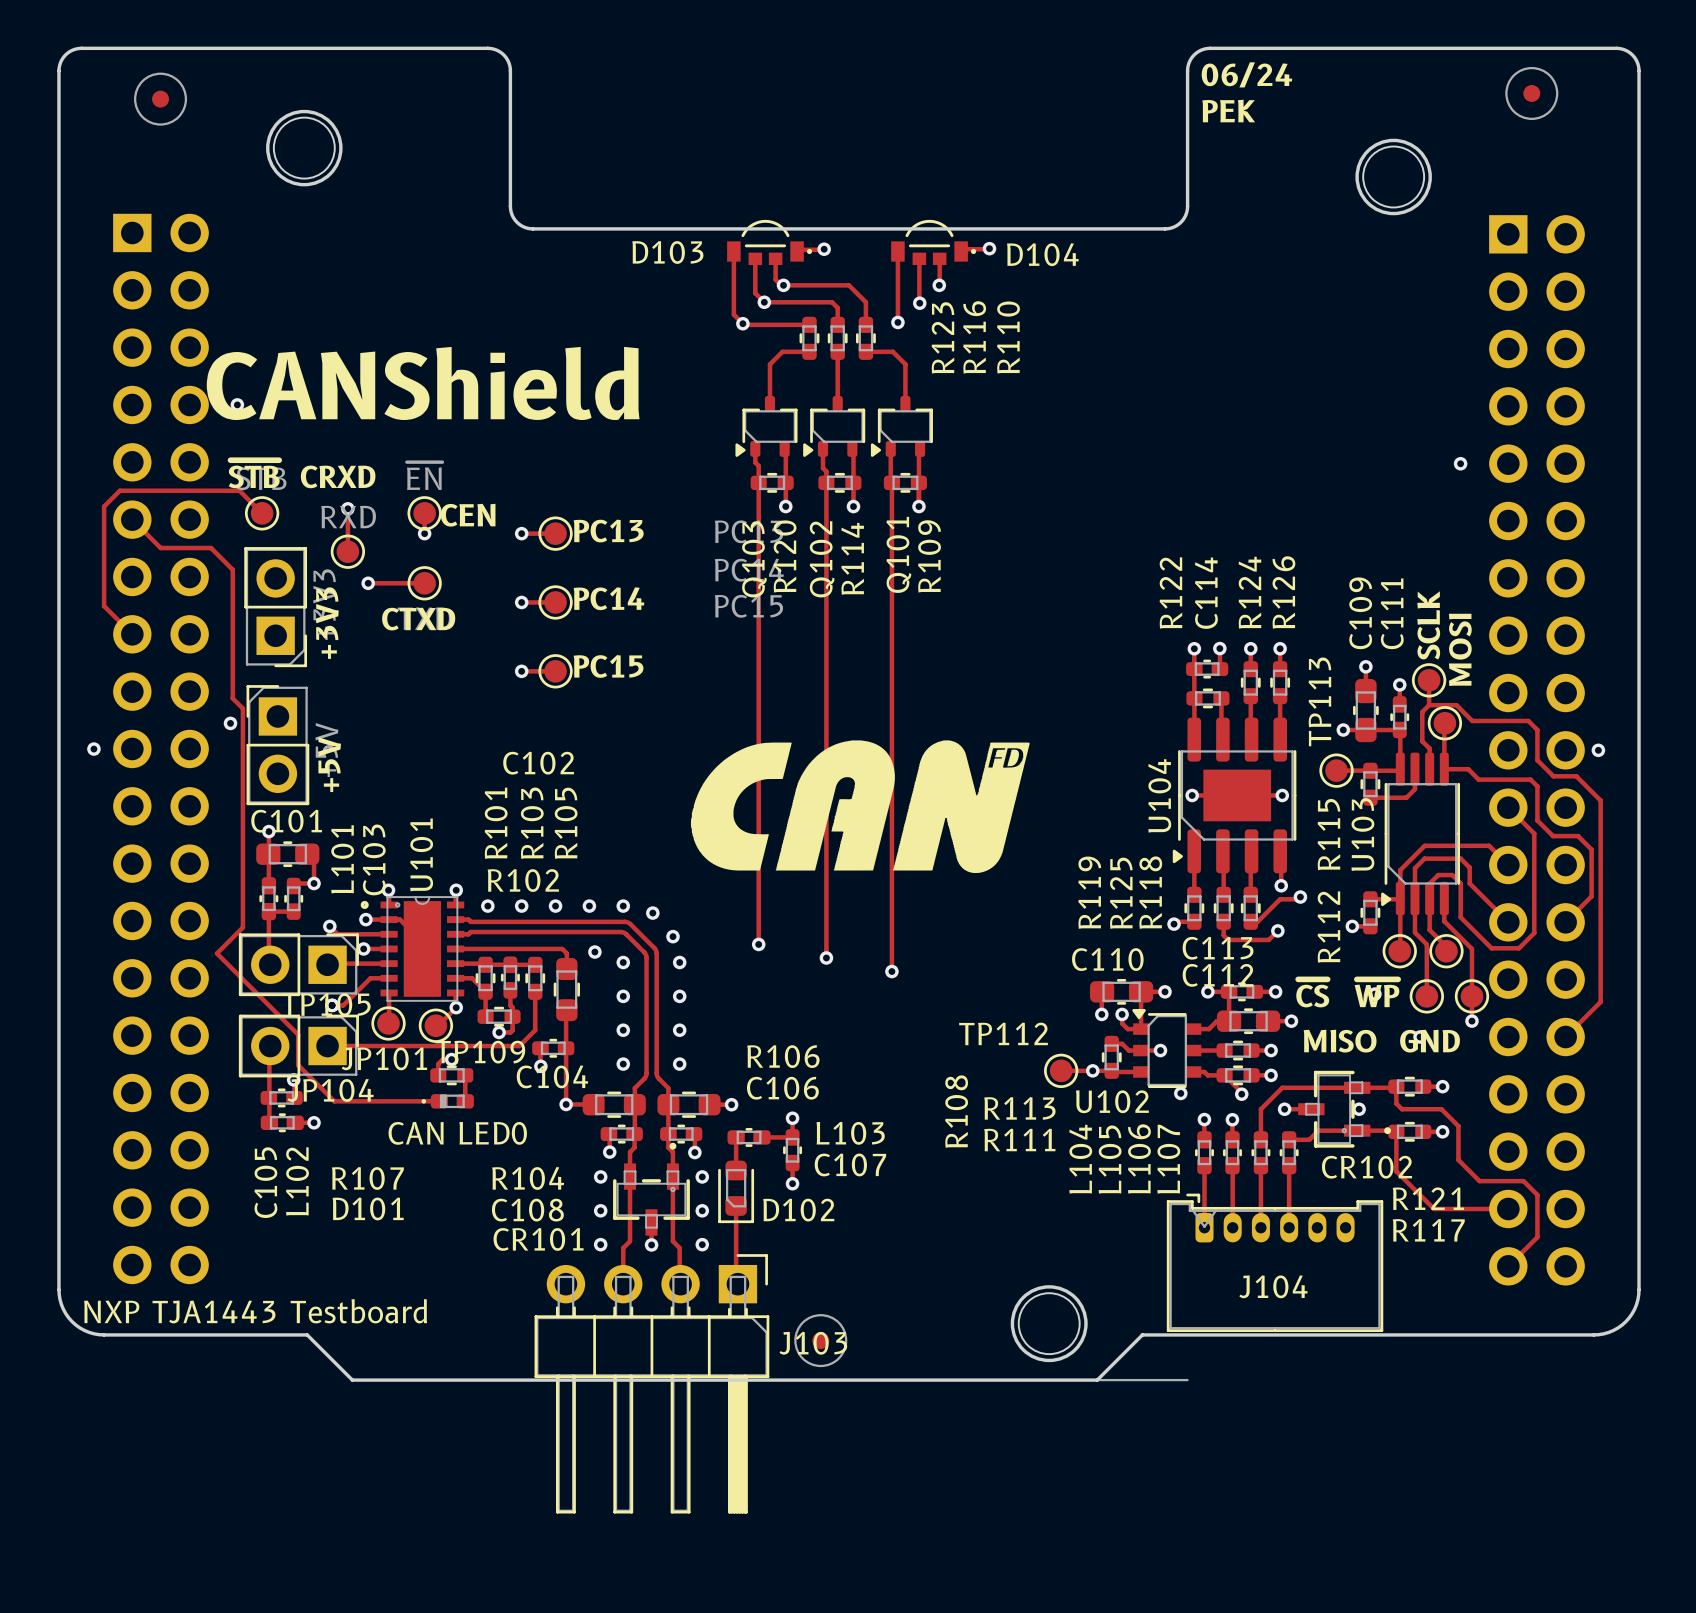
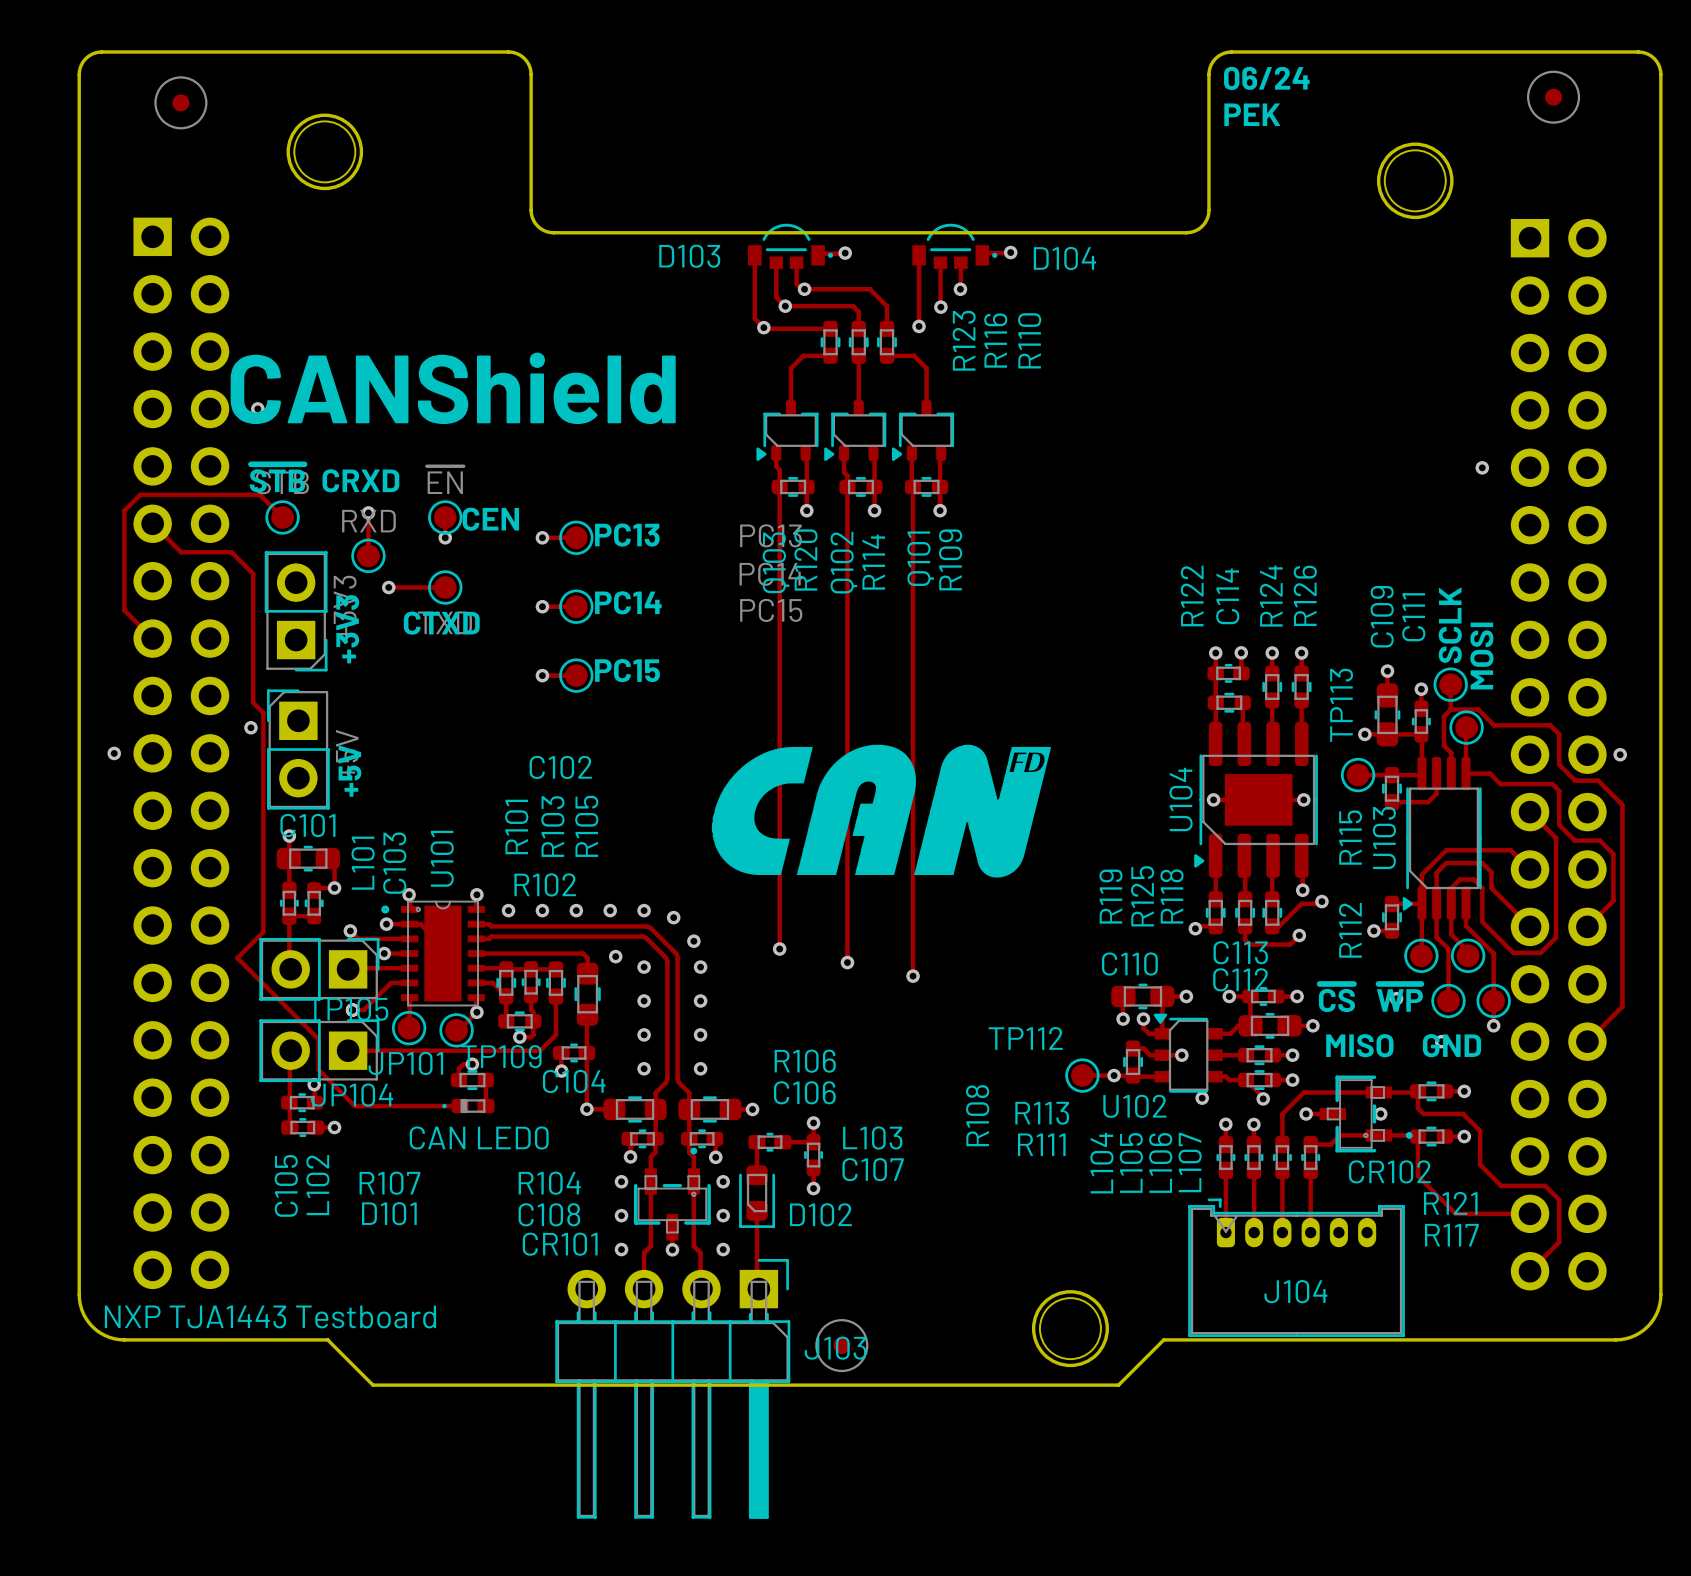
line: (1097, 1380) (1187, 1380) -> none

